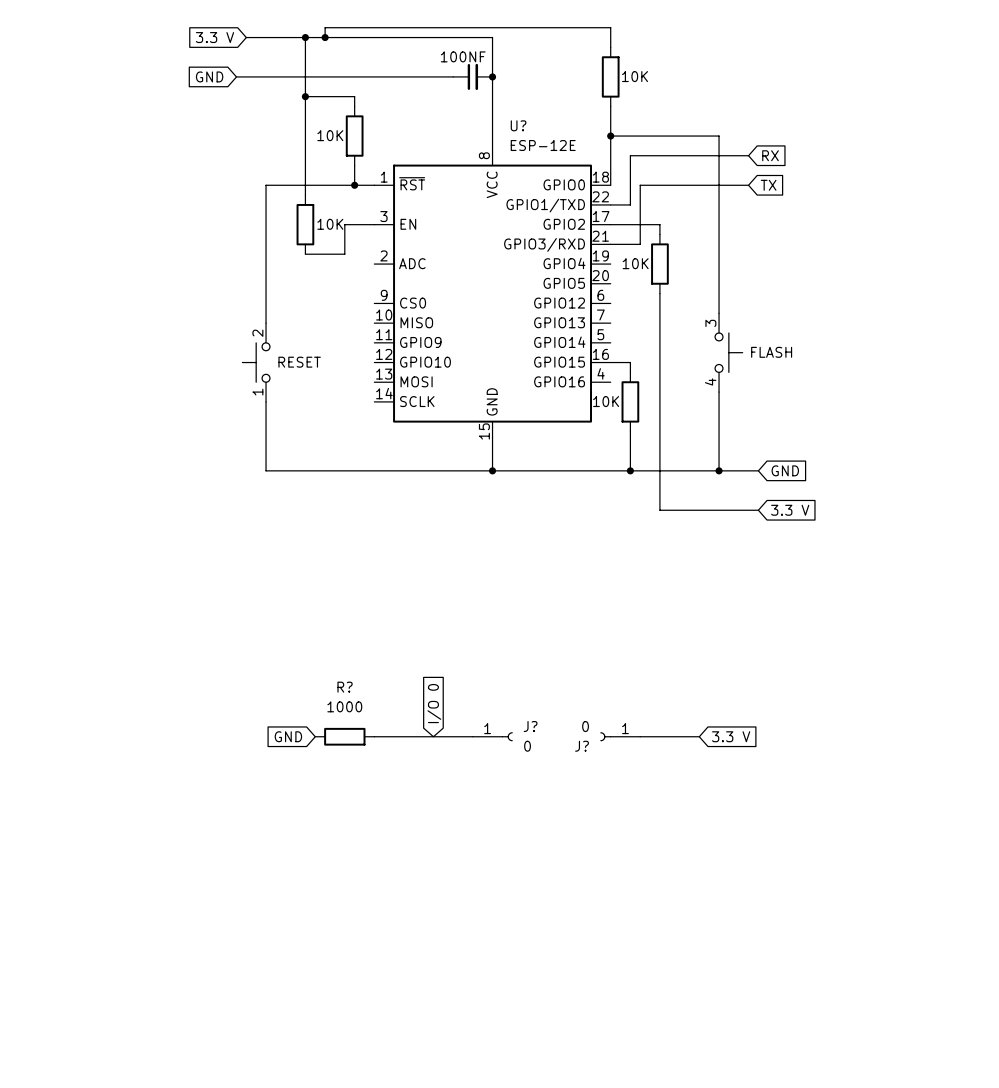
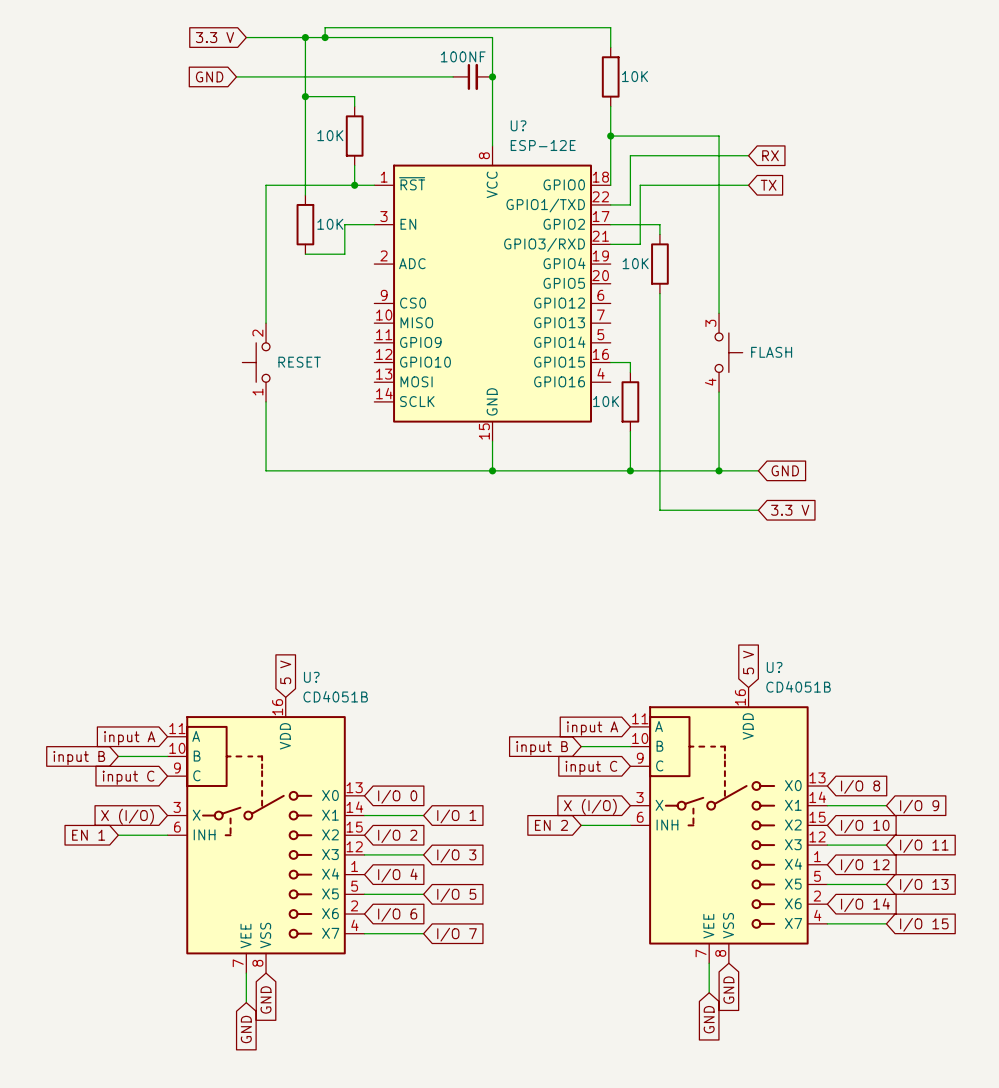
global label: none -> 5 V (748, 662)
global label: none -> 5 V (285, 672)
global label rotation: 0° (434, 703) -> 90° clockwise (397, 796)
global label position: I/O 0 (434, 703) -> I/O 0 (397, 796)
global label: none -> input A (592, 728)
global label: GND (288, 736) -> none
R?: 1000 (344, 736) -> none
wire: (374, 736) (472, 736) -> none
J?: 0 (492, 736) -> none
J?: 0 (620, 736) -> none
global label: 3.3 V (731, 736) -> none
global label: none -> input A (129, 738)
wire: none -> (581, 746) (630, 746)
global label: none -> input B (542, 748)
wire: none -> (118, 756) (167, 756)
global label: none -> input B (79, 758)
global label: none -> input C (591, 767)
global label: none -> input C (128, 777)
global label: none -> I/O 8 (860, 786)
wire: none -> (827, 805) (886, 805)
global label: none -> X (I/O) (590, 806)
global label: none -> I/O 9 (919, 806)
wire: none -> (364, 815) (423, 815)
global label: none -> X (I/O) (127, 816)
global label: none -> I/O 1 (456, 816)
global label: none -> EN 2 (551, 825)
wire: none -> (581, 825) (630, 825)
U?: none -> CD4051B (728, 825)
global label: none -> I/O 10 (865, 826)
global label: none -> EN 1 (88, 835)
wire: none -> (118, 835) (167, 835)
U?: none -> CD4051B (266, 835)
global label: none -> I/O 2 (397, 836)
wire: none -> (827, 845) (886, 845)
global label: none -> I/O 11 (924, 846)
wire: none -> (364, 854) (423, 854)
global label: none -> I/O 3 (456, 855)
global label: none -> I/O 12 (865, 865)
global label: none -> I/O 4 (397, 875)
wire: none -> (827, 884) (886, 884)
global label: none -> I/O 13 (924, 885)
wire: none -> (364, 894) (423, 894)
global label: none -> I/O 5 (456, 895)
global label: none -> I/O 14 (865, 905)
global label: none -> I/O 6 (397, 914)
wire: none -> (827, 923) (886, 923)
global label: none -> I/O 15 (924, 924)
wire: none -> (364, 933) (423, 933)
global label: none -> I/O 7 (457, 934)
wire: none -> (709, 963) (709, 992)
wire: none -> (246, 973) (246, 1002)
global label: none -> GND (728, 990)
global label: none -> GND (266, 999)
global label: none -> GND (709, 1019)
global label: none -> GND (246, 1029)

